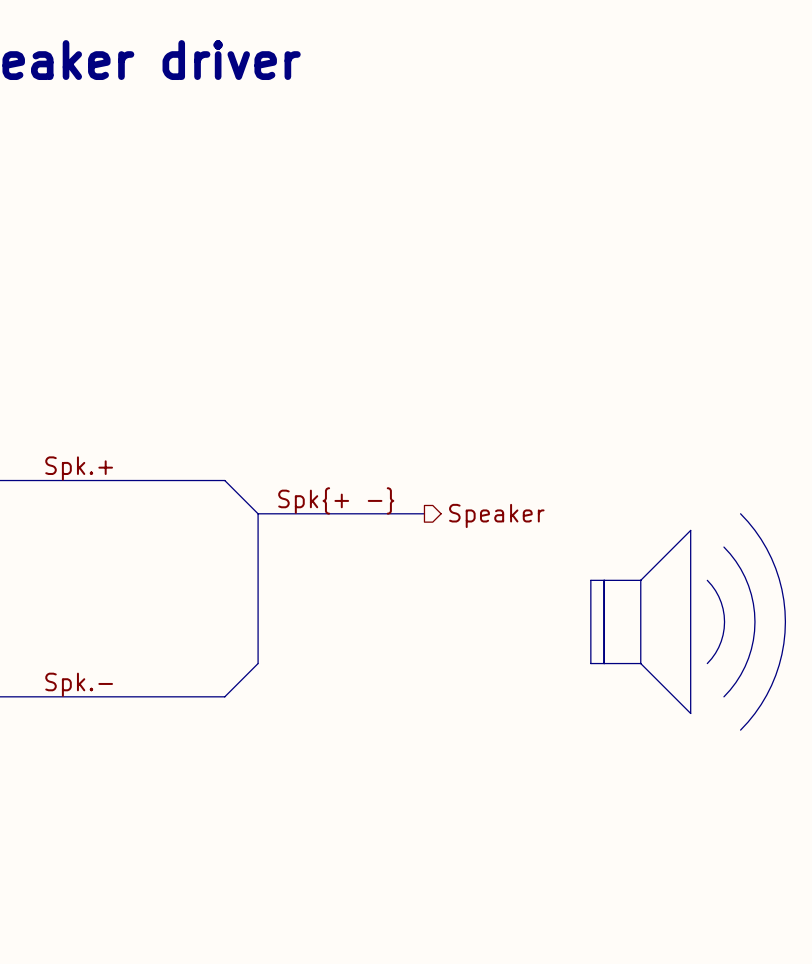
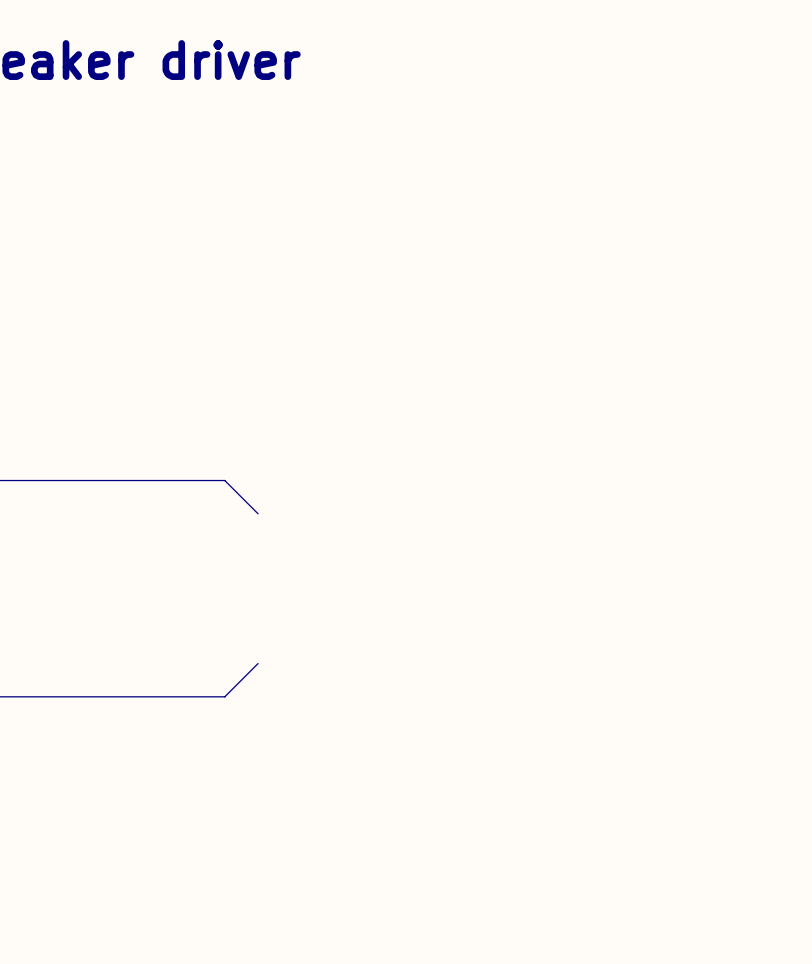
label: Spk.+ (79, 468) -> none
label: Spk{+ -} (336, 500) -> none
bus: (424, 513) (258, 513) (258, 663) -> none
line: (740, 513) (761, 539) (775, 568) (783, 600) (785, 621) (781, 654) (771, 685) (754, 713) (740, 730) -> none
hierarchical label: Speaker (496, 515) -> none
line: (723, 547) (735, 561) (748, 585) (753, 603) (754, 621) (753, 640) (745, 666) (735, 682) (723, 696) -> none
line: (604, 580) (604, 663) -> none
line: (640, 580) (690, 530) (690, 713) (640, 663) -> none
line: (640, 580) (590, 580) (590, 663) (640, 663) -> none
line: (640, 580) (640, 663) -> none
line: (707, 580) (718, 596) (724, 621) (721, 641) (707, 663) -> none
label: Spk.- (79, 684) -> none

